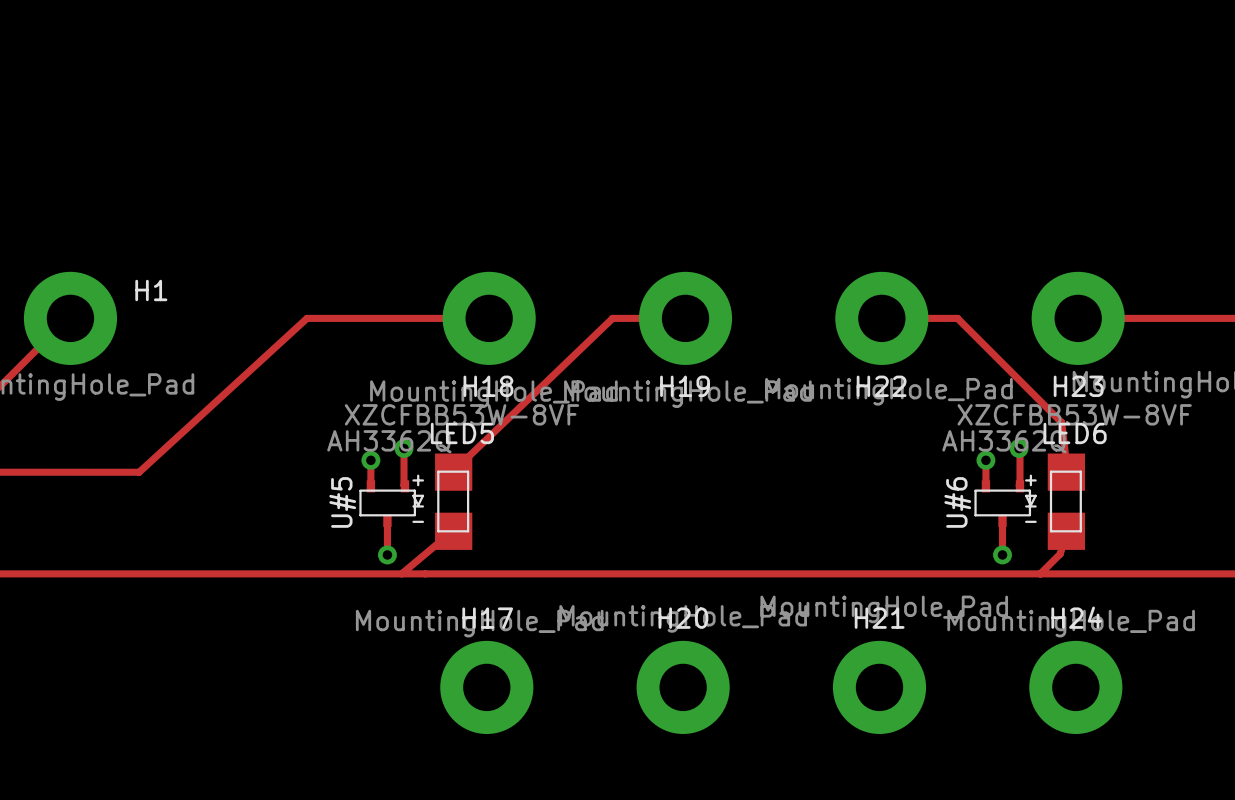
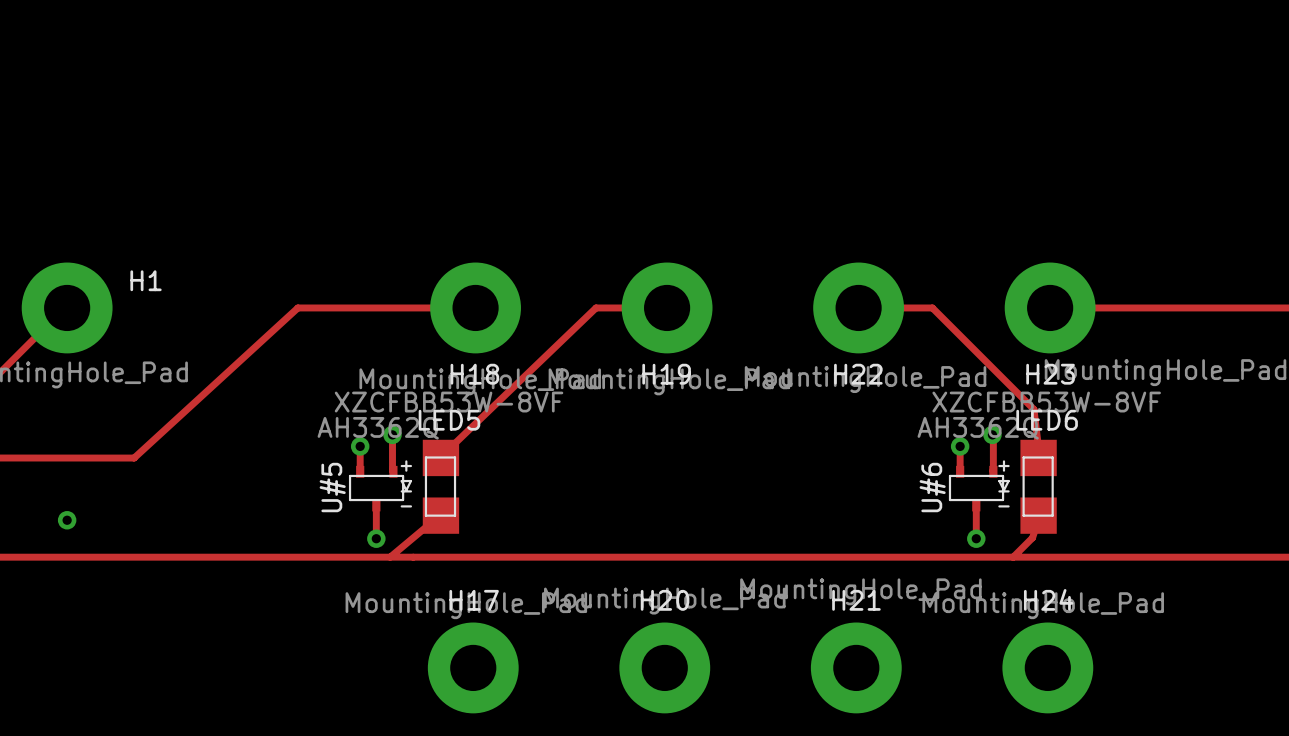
via: none -> (67, 520)

